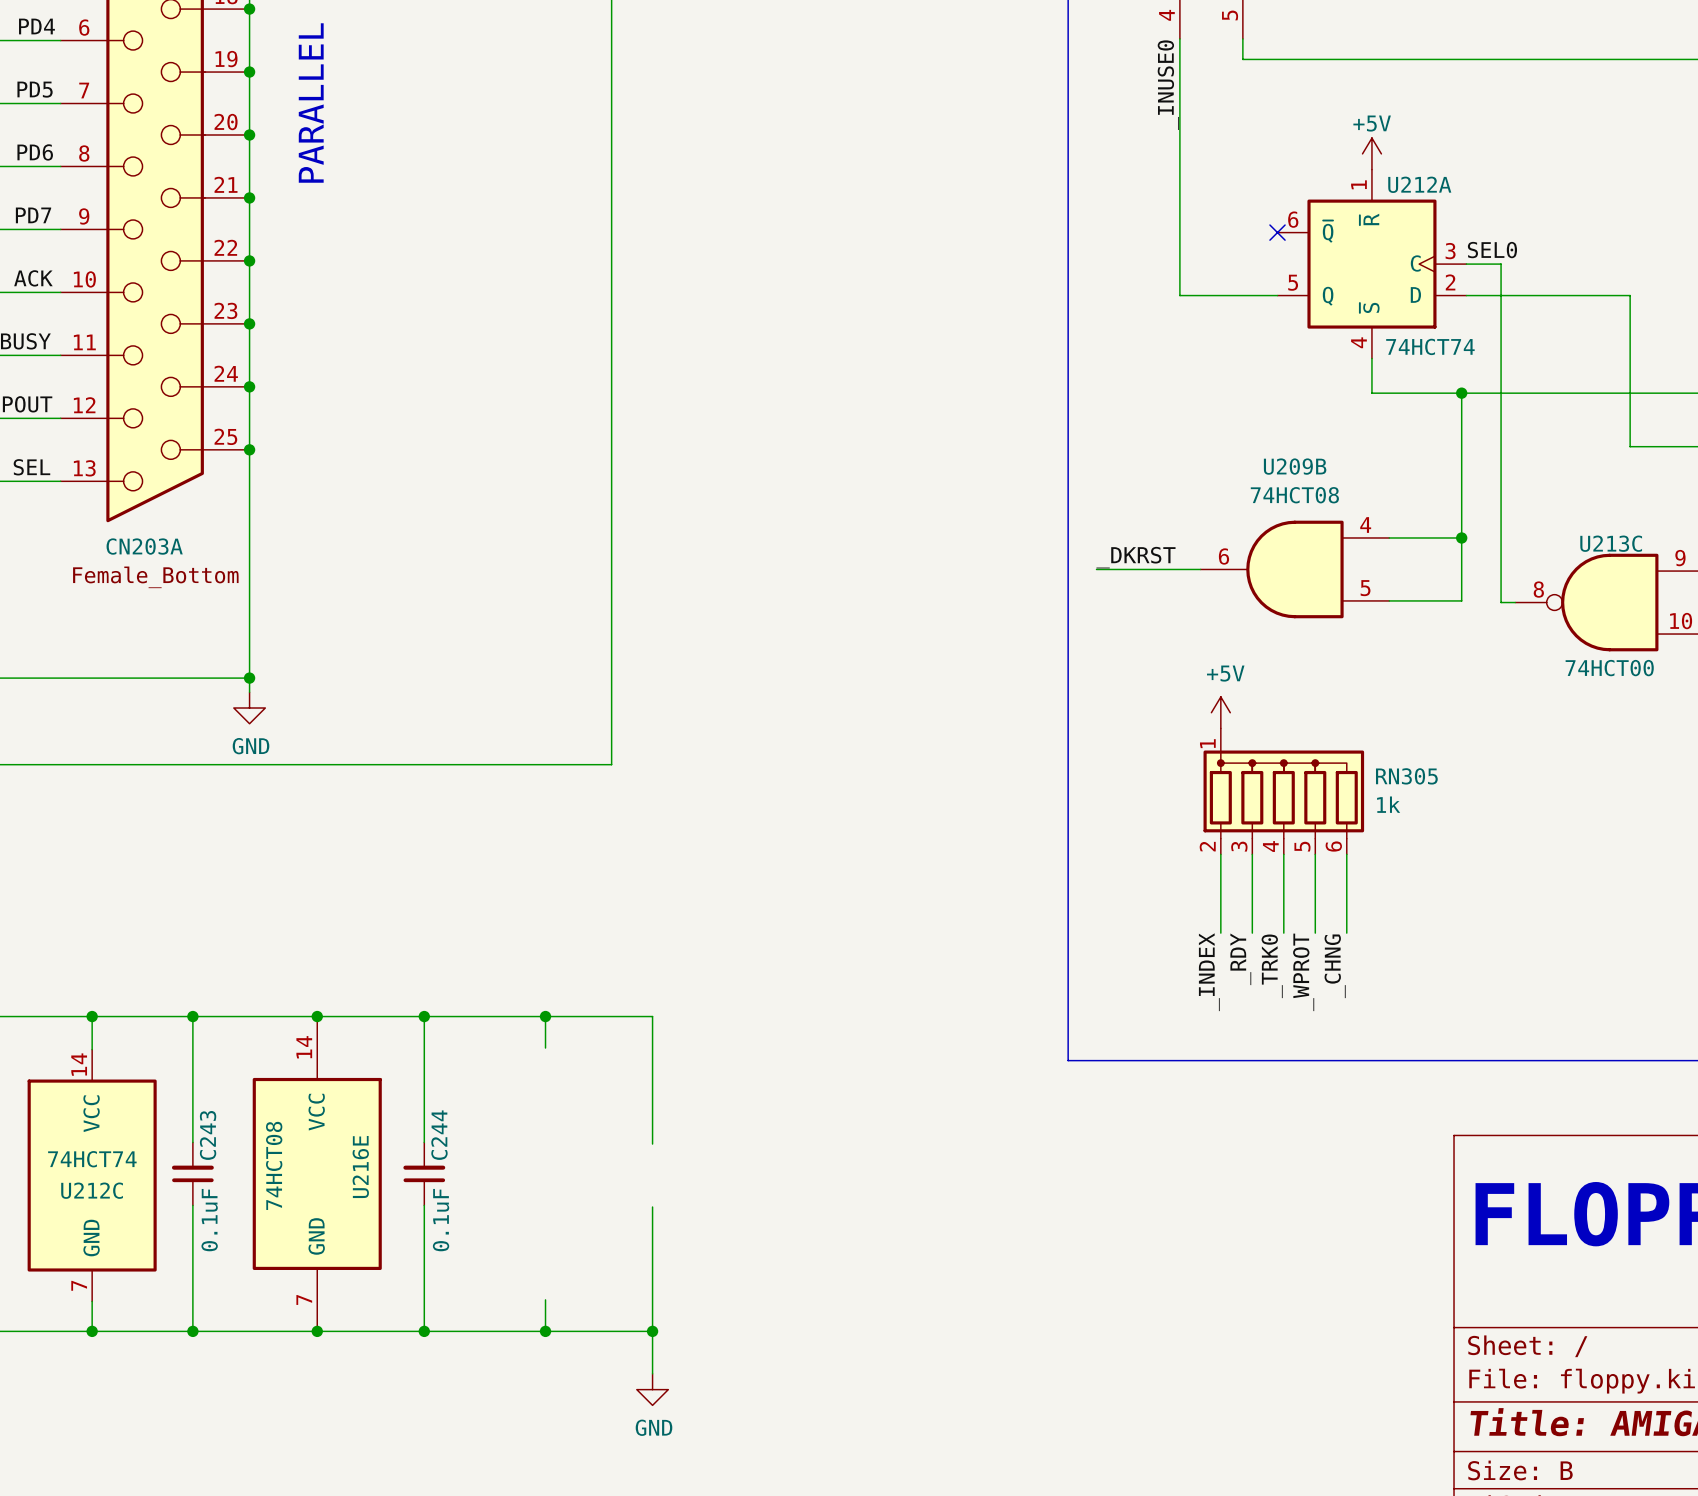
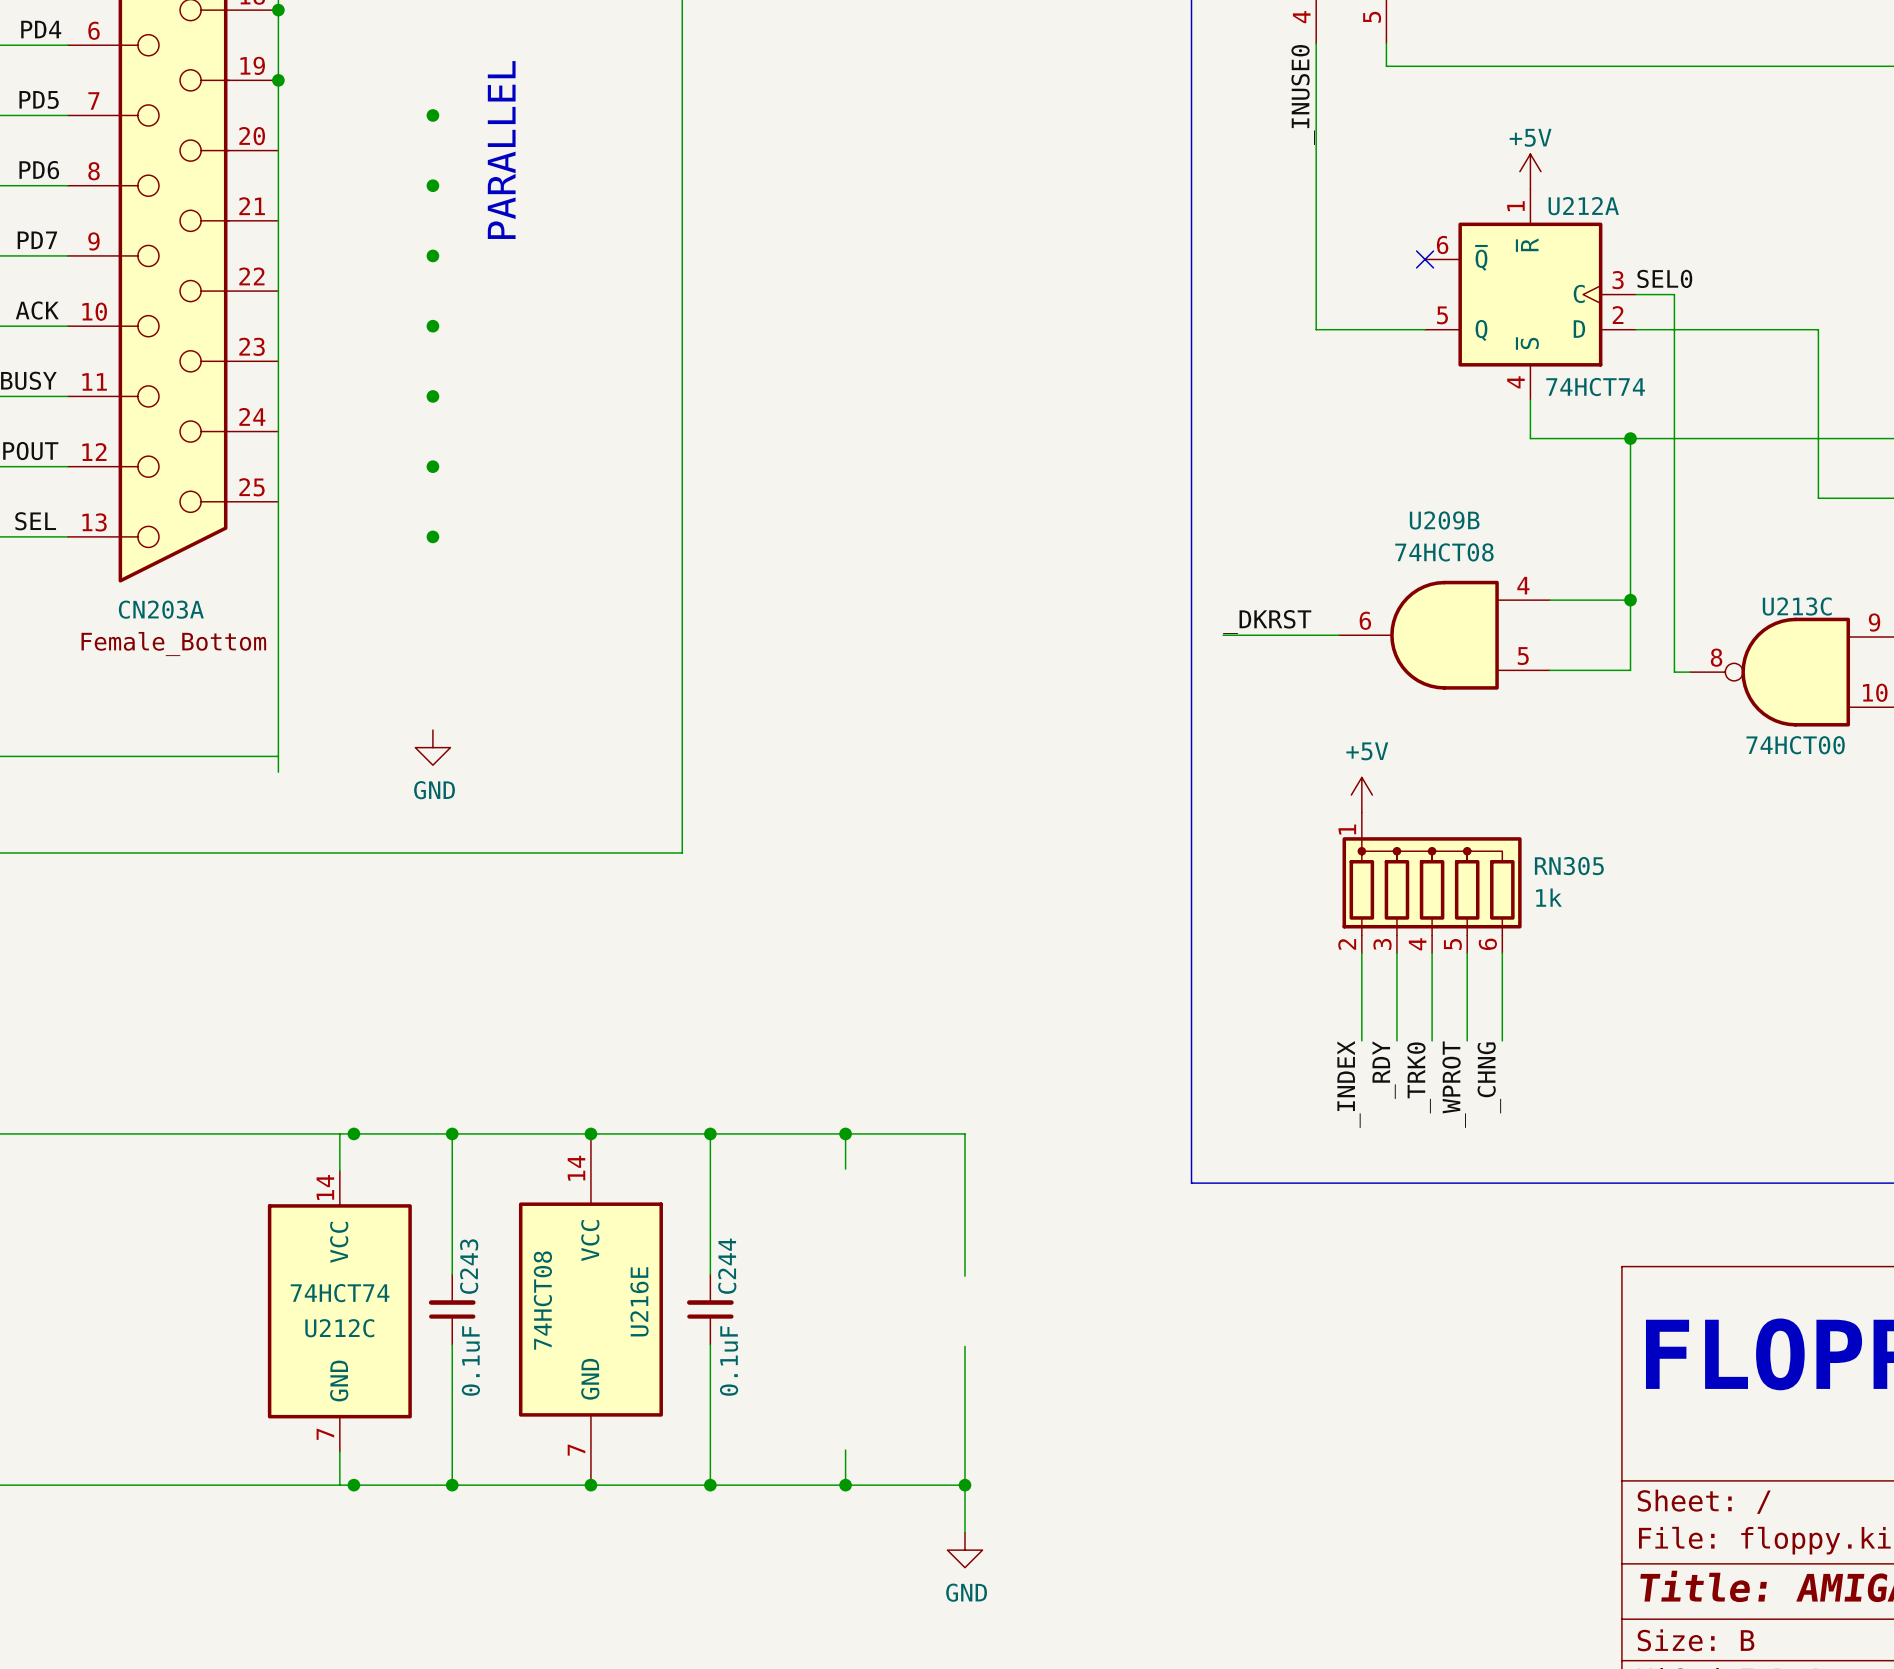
text position: PARALLEL (311, 103) -> PARALLEL (501, 150)
junction: none -> (432, 115)
junction: (249, 135) -> none
junction: none -> (432, 185)
junction: (249, 197) -> none
junction: none -> (432, 255)
junction: (249, 260) -> none
junction: none -> (432, 326)
junction: (249, 323) -> none
junction: none -> (432, 396)
junction: (249, 386) -> none
junction: none -> (432, 466)
junction: (249, 449) -> none
junction: none -> (432, 536)
junction: (249, 678) -> none
power symbol position: GND (249, 708) -> GND (432, 747)
wire: (92, 1016) (92, 1049) -> (339, 1133) (339, 1170)
junction: (92, 1016) -> none
wire: (192, 1016) (192, 1142) -> (452, 1133) (452, 1274)
junction: (192, 1016) -> none
wire: (424, 1016) (424, 1142) -> (710, 1133) (710, 1274)
junction position: (424, 1016) -> (452, 1133)
wire: (545, 1016) (545, 1048) -> (845, 1133) (845, 1169)
junction position: (545, 1016) -> (590, 1133)
junction: none -> (710, 1133)
wire: (652, 1016) (652, 1144) -> (727, 1133) (964, 1133) (964, 1276)
junction: none -> (845, 1133)
C243 position: (192, 1173) -> (452, 1309)
U216E position: (317, 1173) -> (590, 1309)
C244 position: (424, 1173) -> (710, 1309)
U212C position: (92, 1175) -> (339, 1311)
wire: (192, 1205) (192, 1331) -> (452, 1344) (452, 1485)
wire: (424, 1205) (424, 1331) -> (710, 1344) (710, 1485)
wire: (652, 1207) (652, 1373) -> (964, 1346) (964, 1532)
wire: (545, 1299) (545, 1331) -> (845, 1450) (845, 1485)
wire: (92, 1301) (92, 1331) -> (339, 1451) (339, 1485)
junction: (92, 1331) -> none
junction: (192, 1331) -> none
junction position: (424, 1331) -> (452, 1485)
junction position: (545, 1331) -> (590, 1485)
wire: none -> (727, 1485) (964, 1485)
junction position: (652, 1331) -> (710, 1485)
junction: none -> (845, 1485)
junction: none -> (964, 1485)
power symbol position: GND (652, 1389) -> GND (964, 1550)

